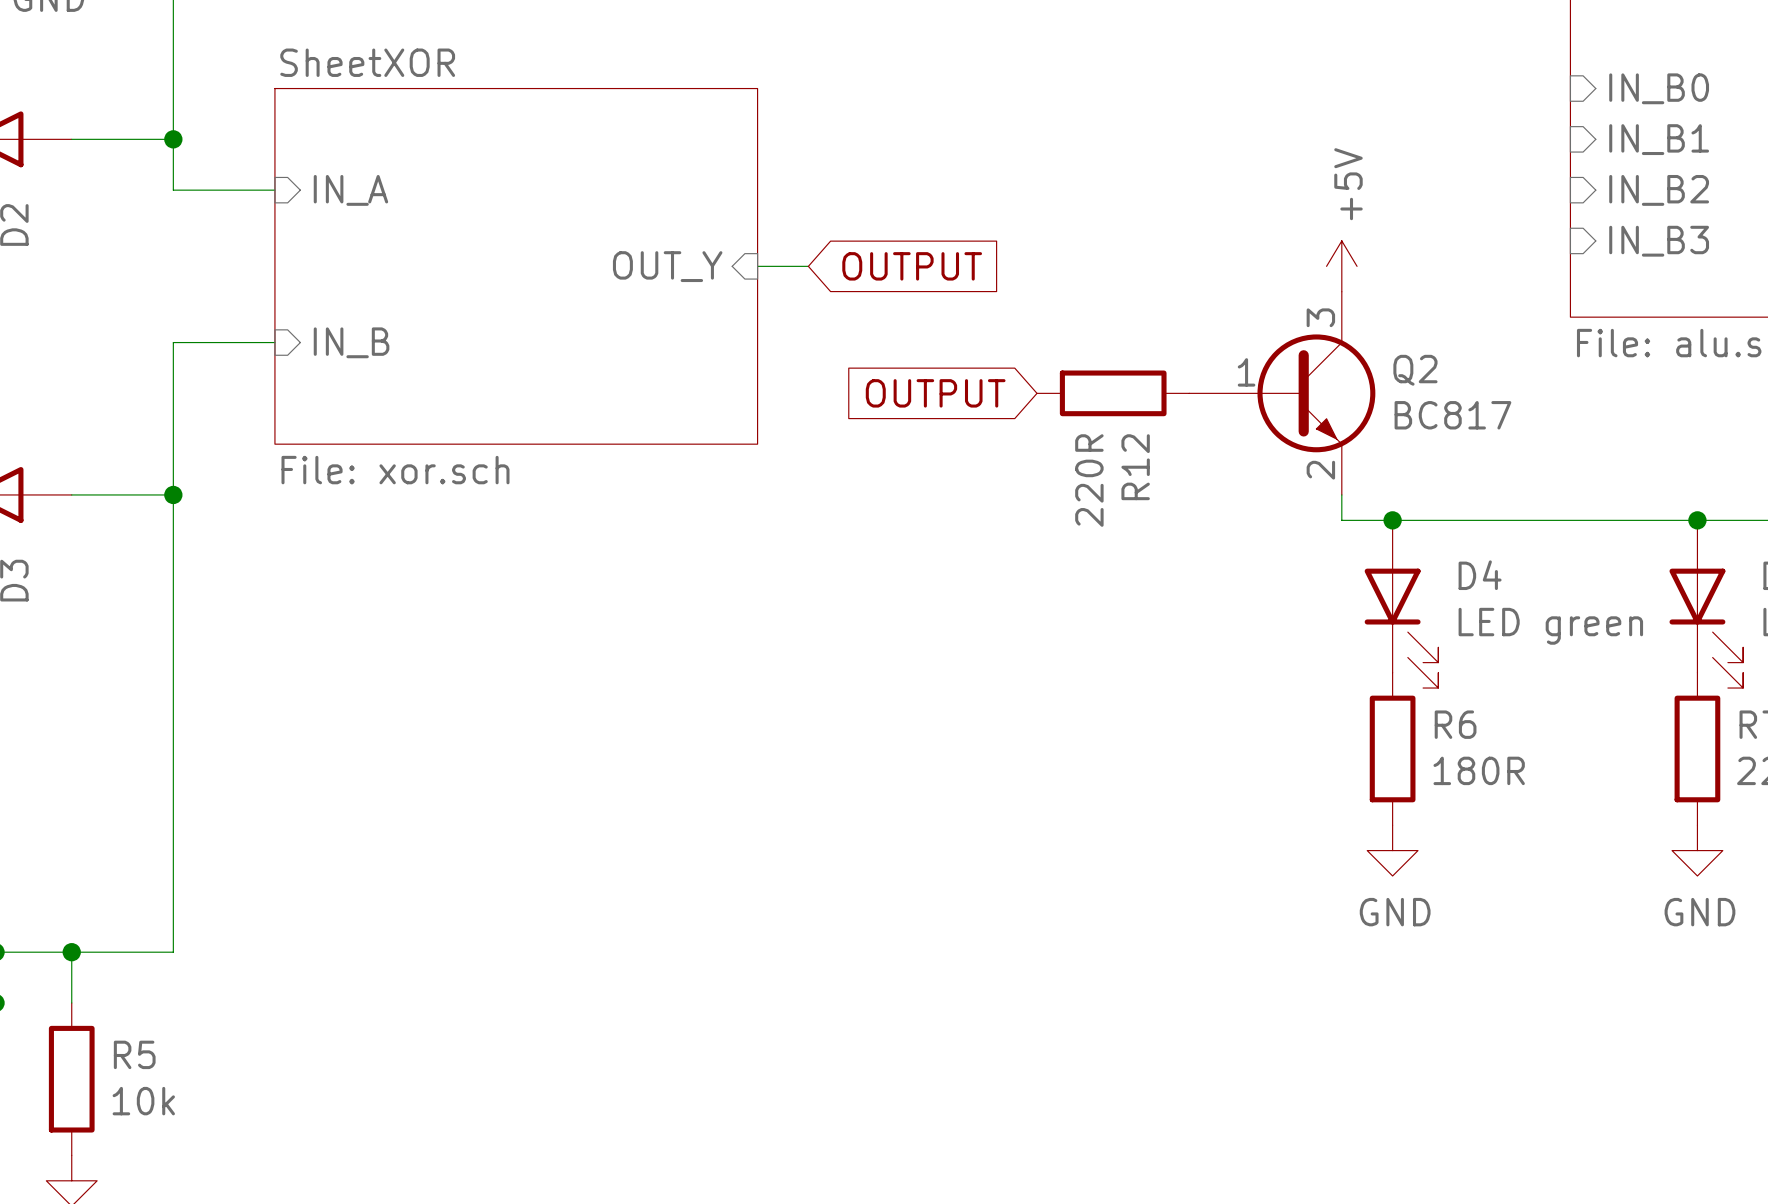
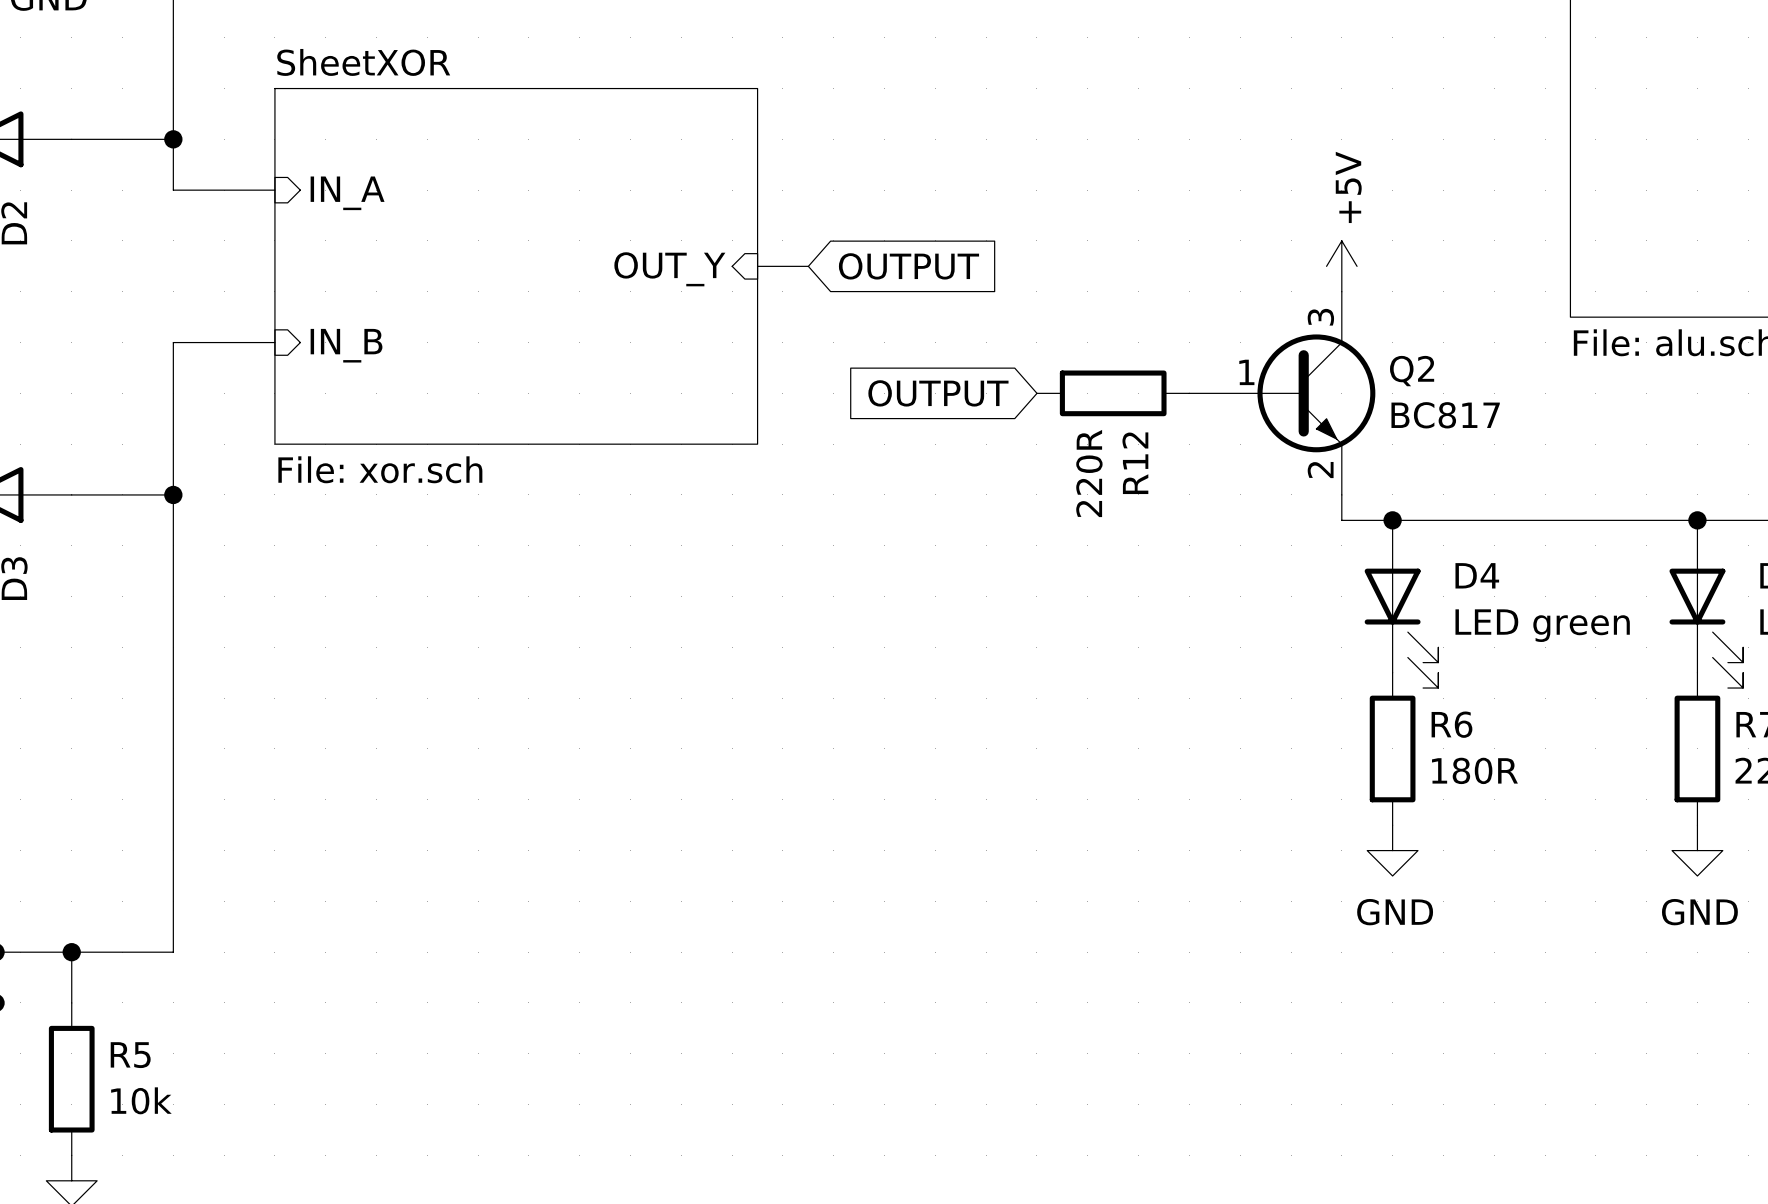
sheet pin: IN_B0 (1659, 88) -> none
sheet pin: IN_B1 (1659, 139) -> none
sheet pin: IN_B2 (1659, 190) -> none
sheet pin: IN_B3 (1659, 241) -> none

